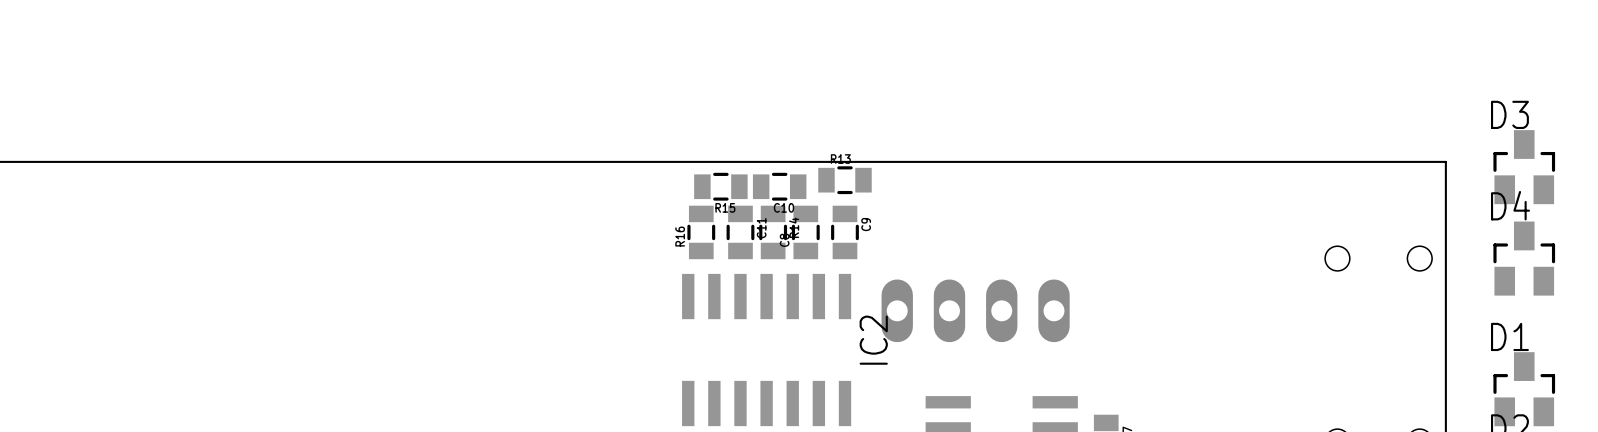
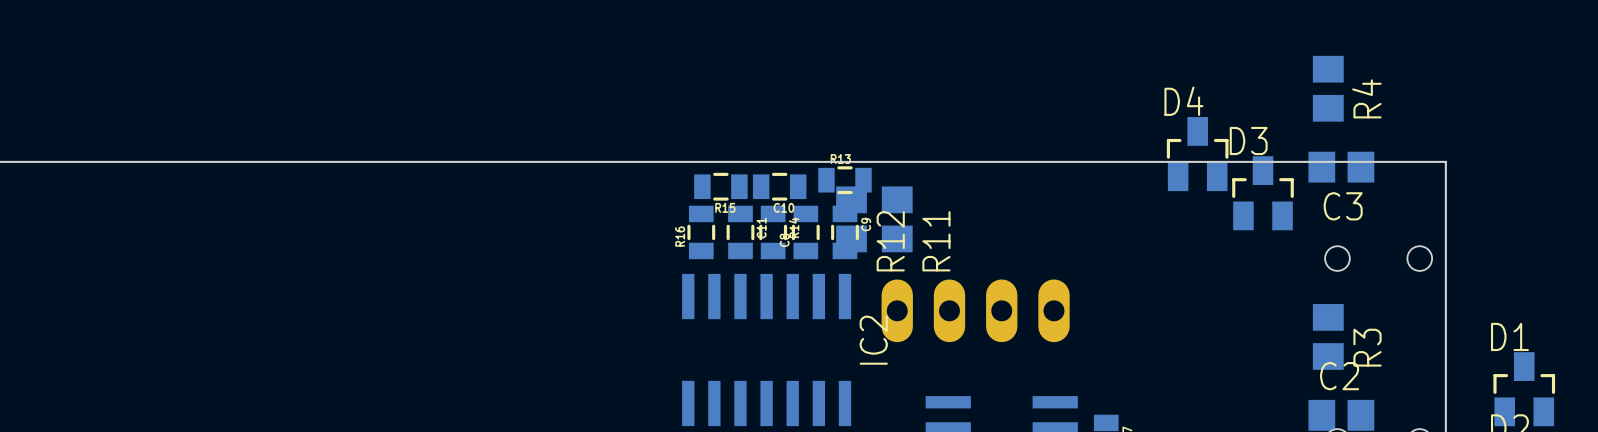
R4: none -> (1328, 88)
C3: none -> (1341, 167)
D3 position: (1524, 167) -> (1263, 193)
R12: none -> (851, 219)
R11: none -> (897, 219)
D4 position: (1524, 258) -> (1197, 154)
R3: none -> (1328, 336)
C2: none -> (1341, 415)

